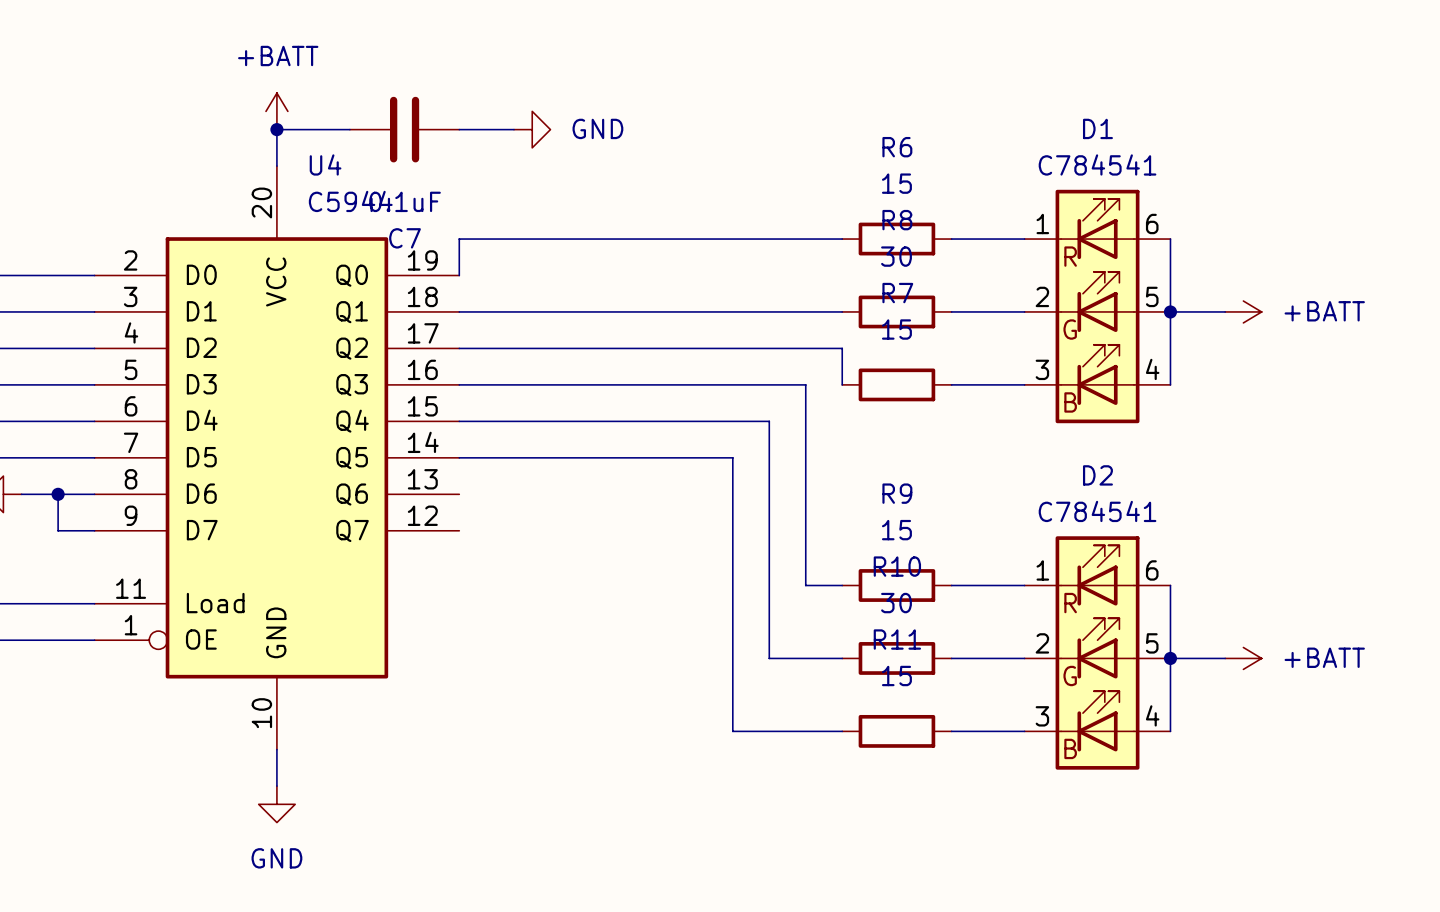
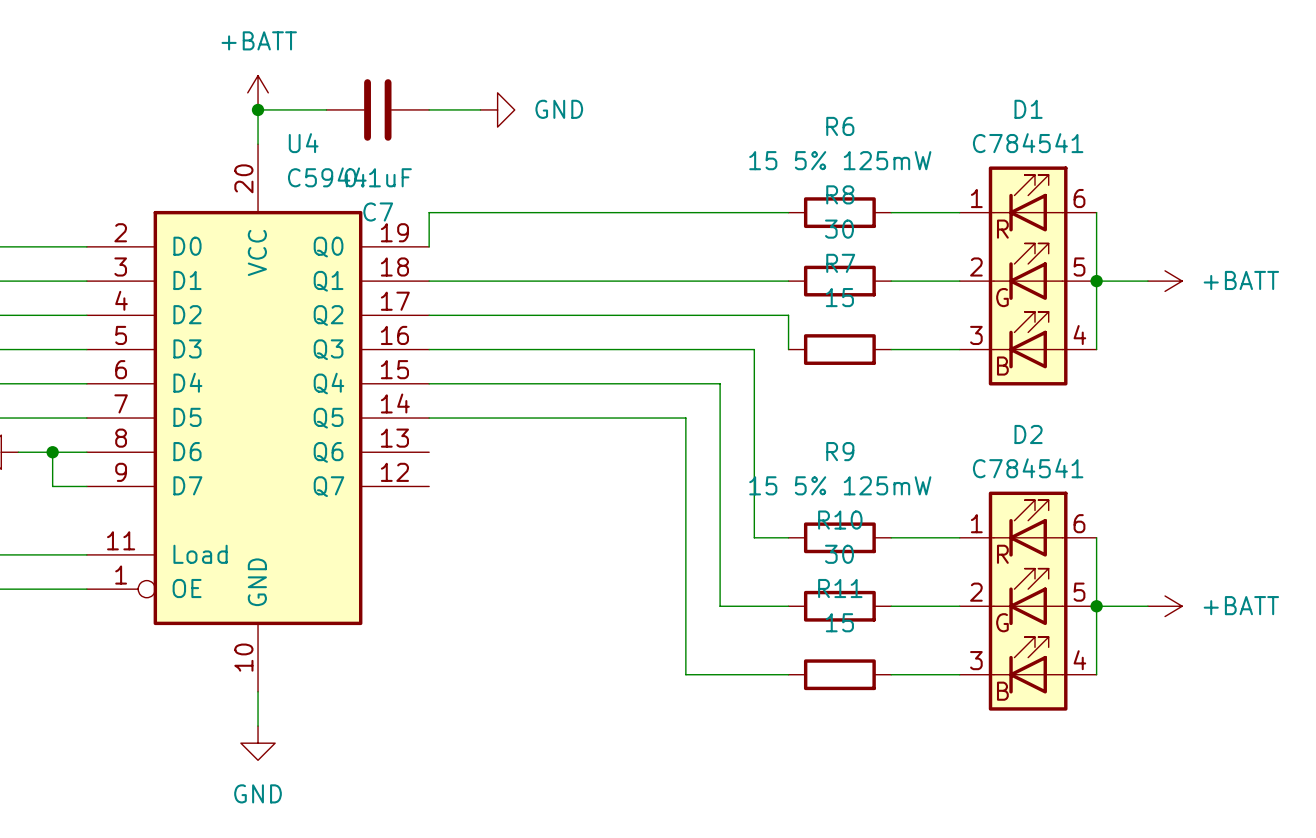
R6 value: 15 (896, 183) -> 15 5% 125mW (840, 160)
R9 value: 15 (896, 530) -> 15 5% 125mW (840, 485)

